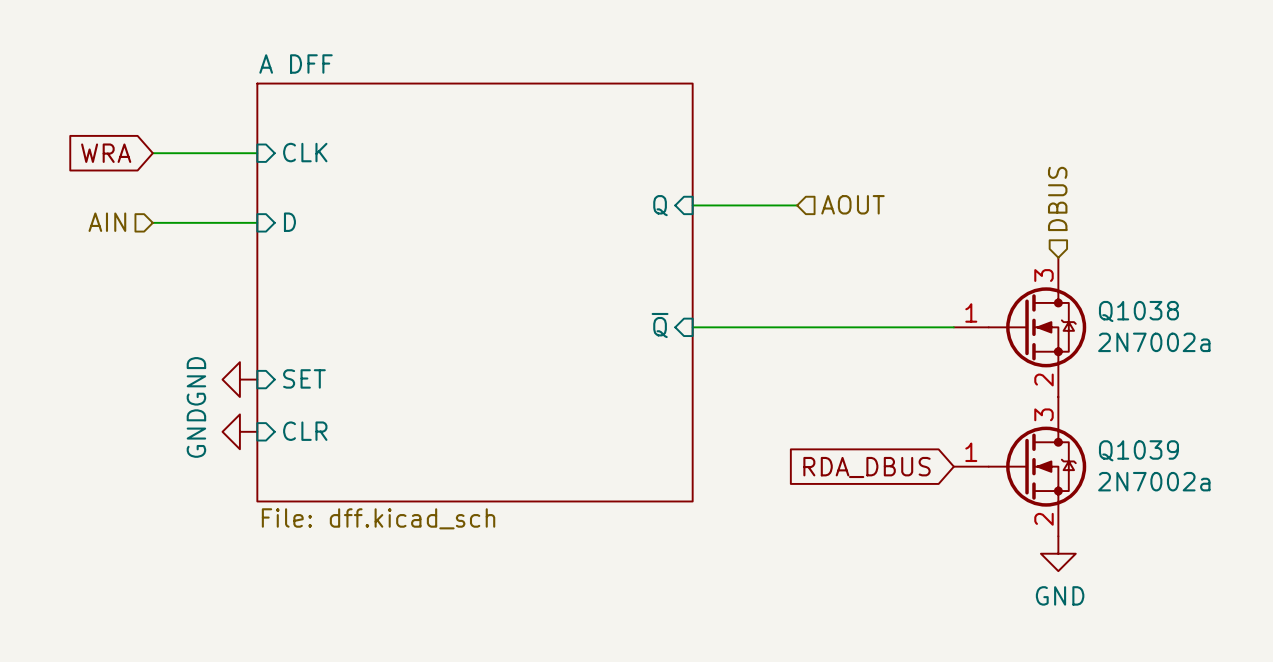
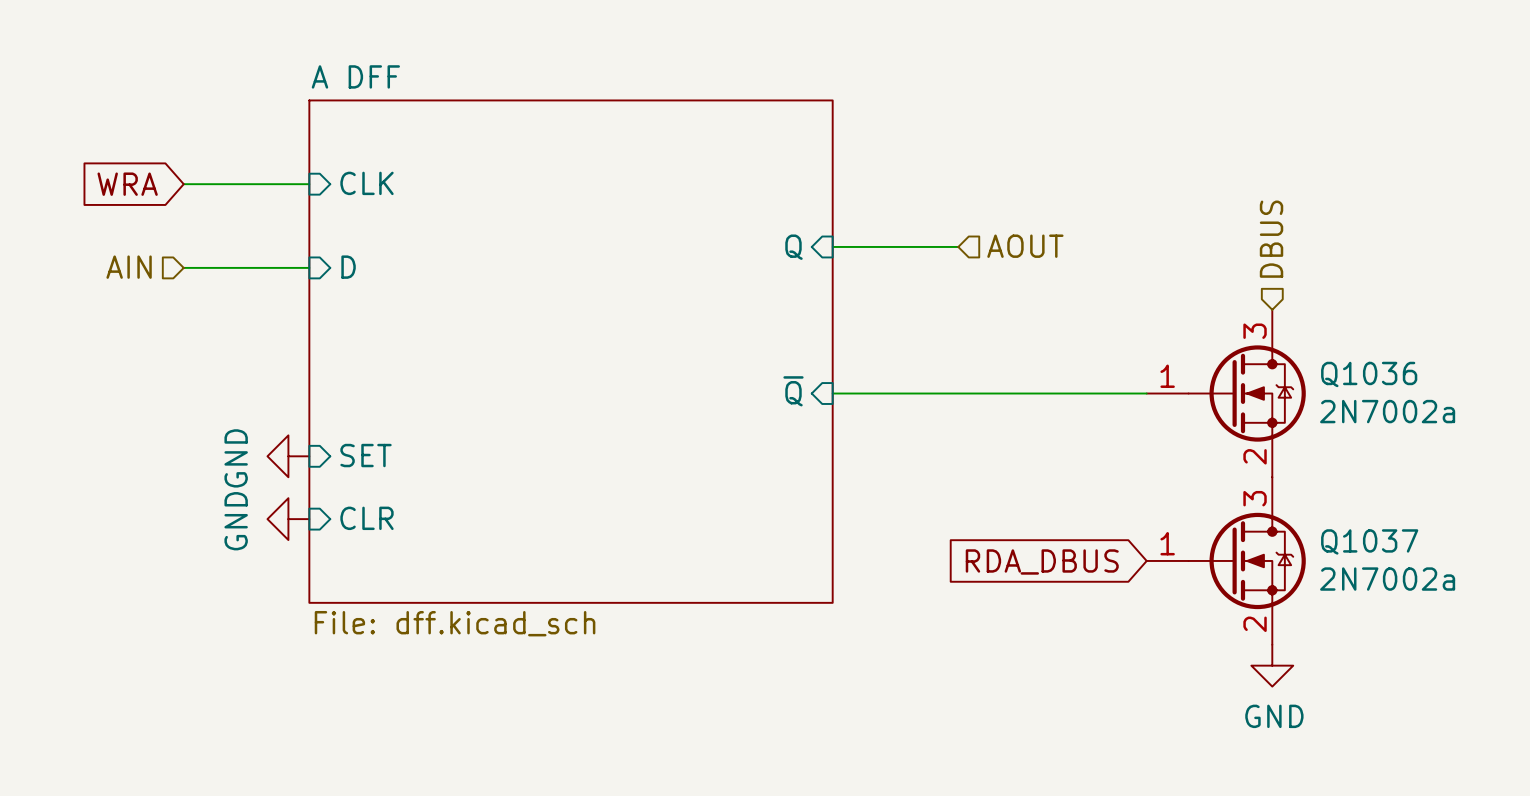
Q1038 name: Q1038 (1138, 311) -> Q1036 (1369, 374)
Q1039 name: Q1039 (1138, 450) -> Q1037 (1369, 541)

